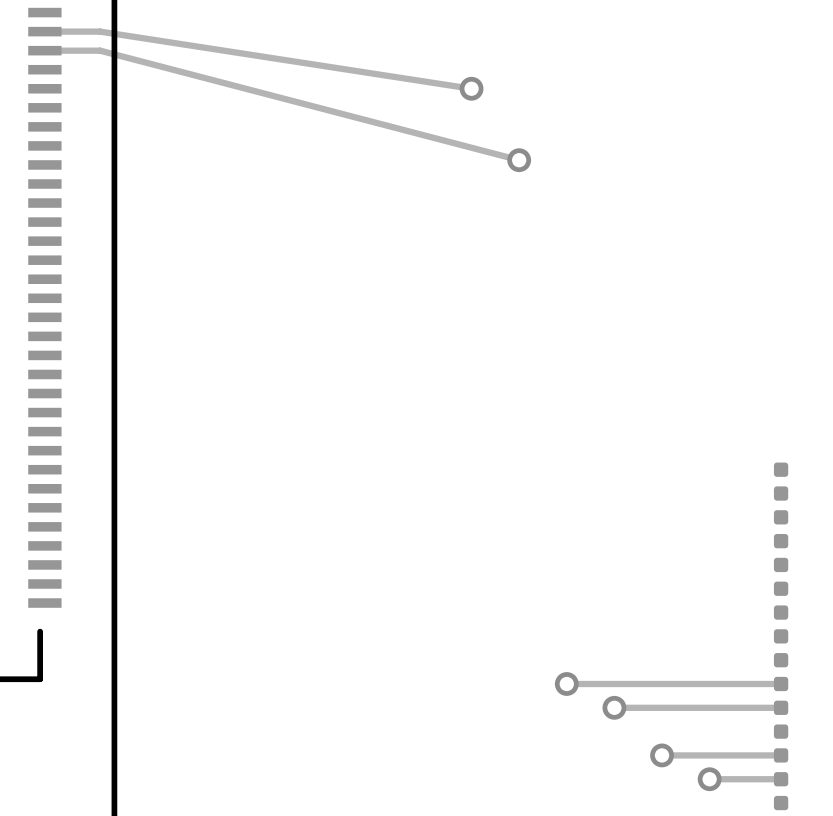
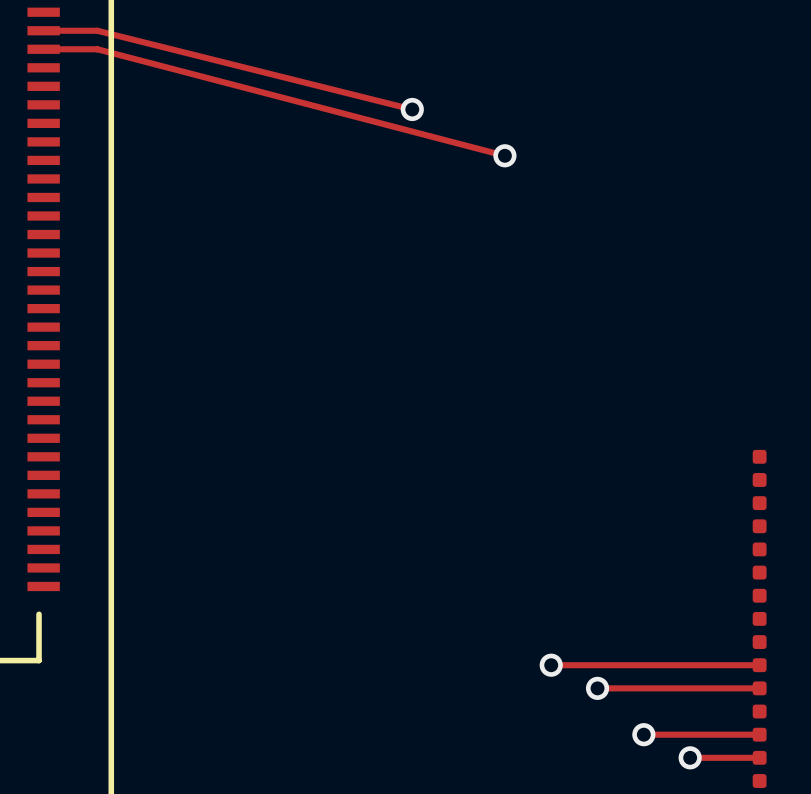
track: (100, 31) (471, 88) -> (97, 30) (412, 109)
via position: (471, 88) -> (412, 109)

